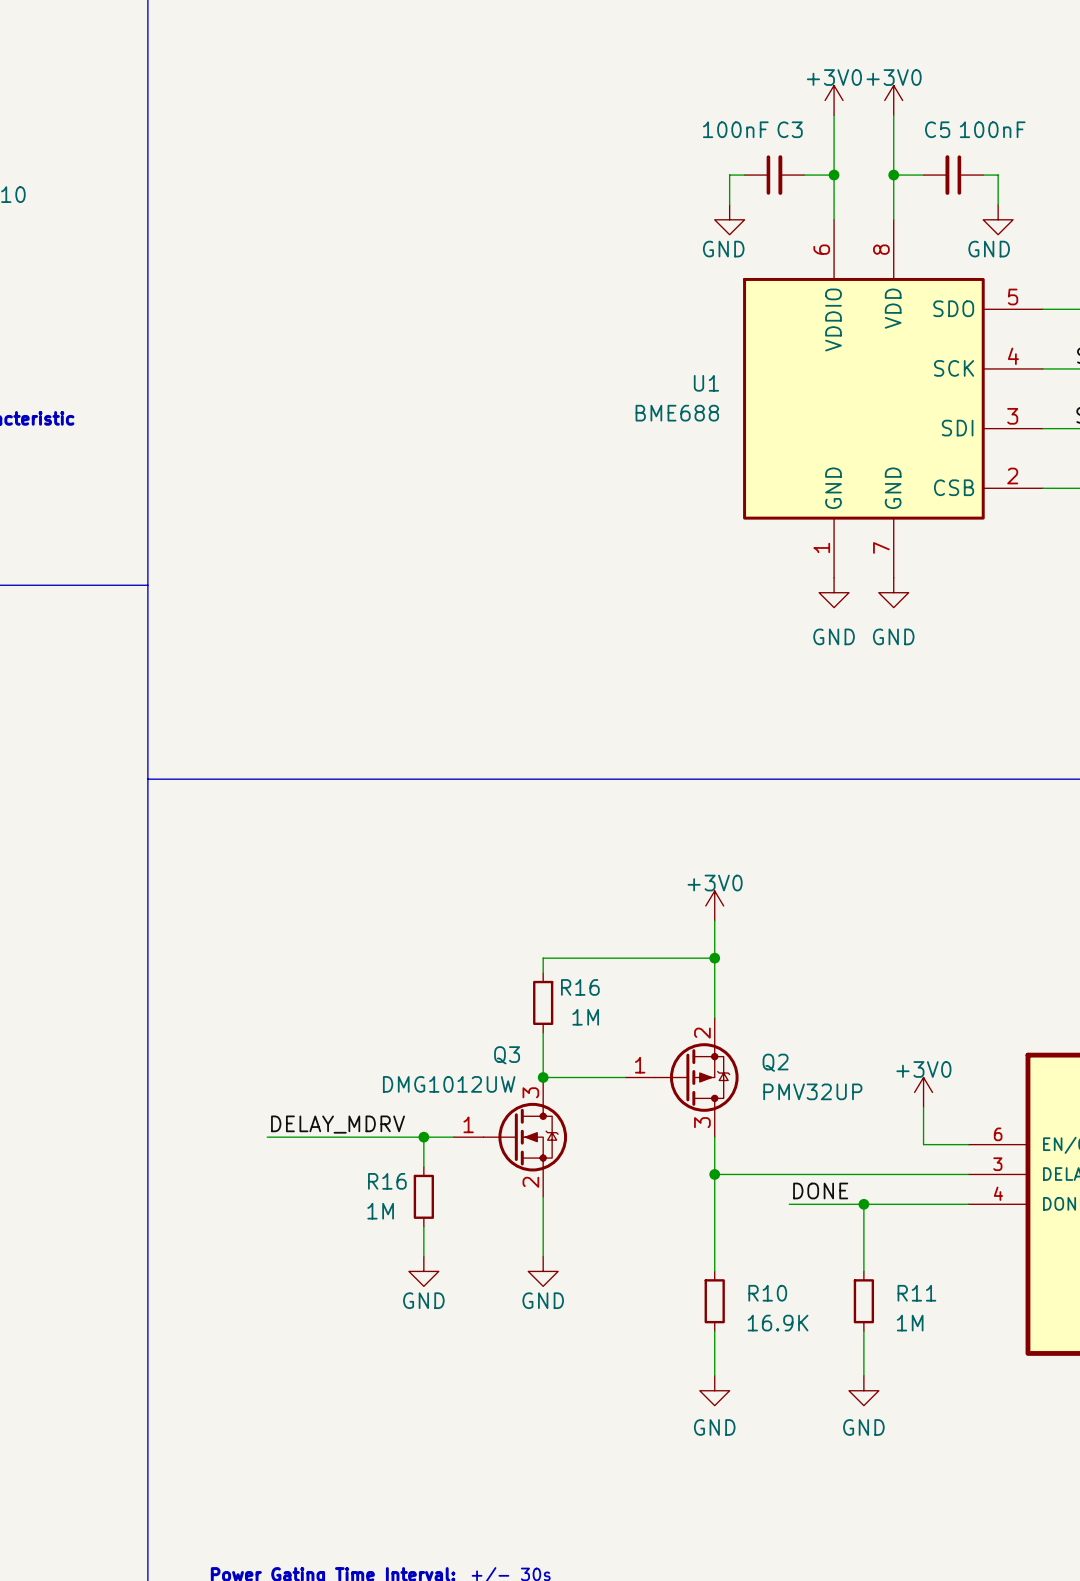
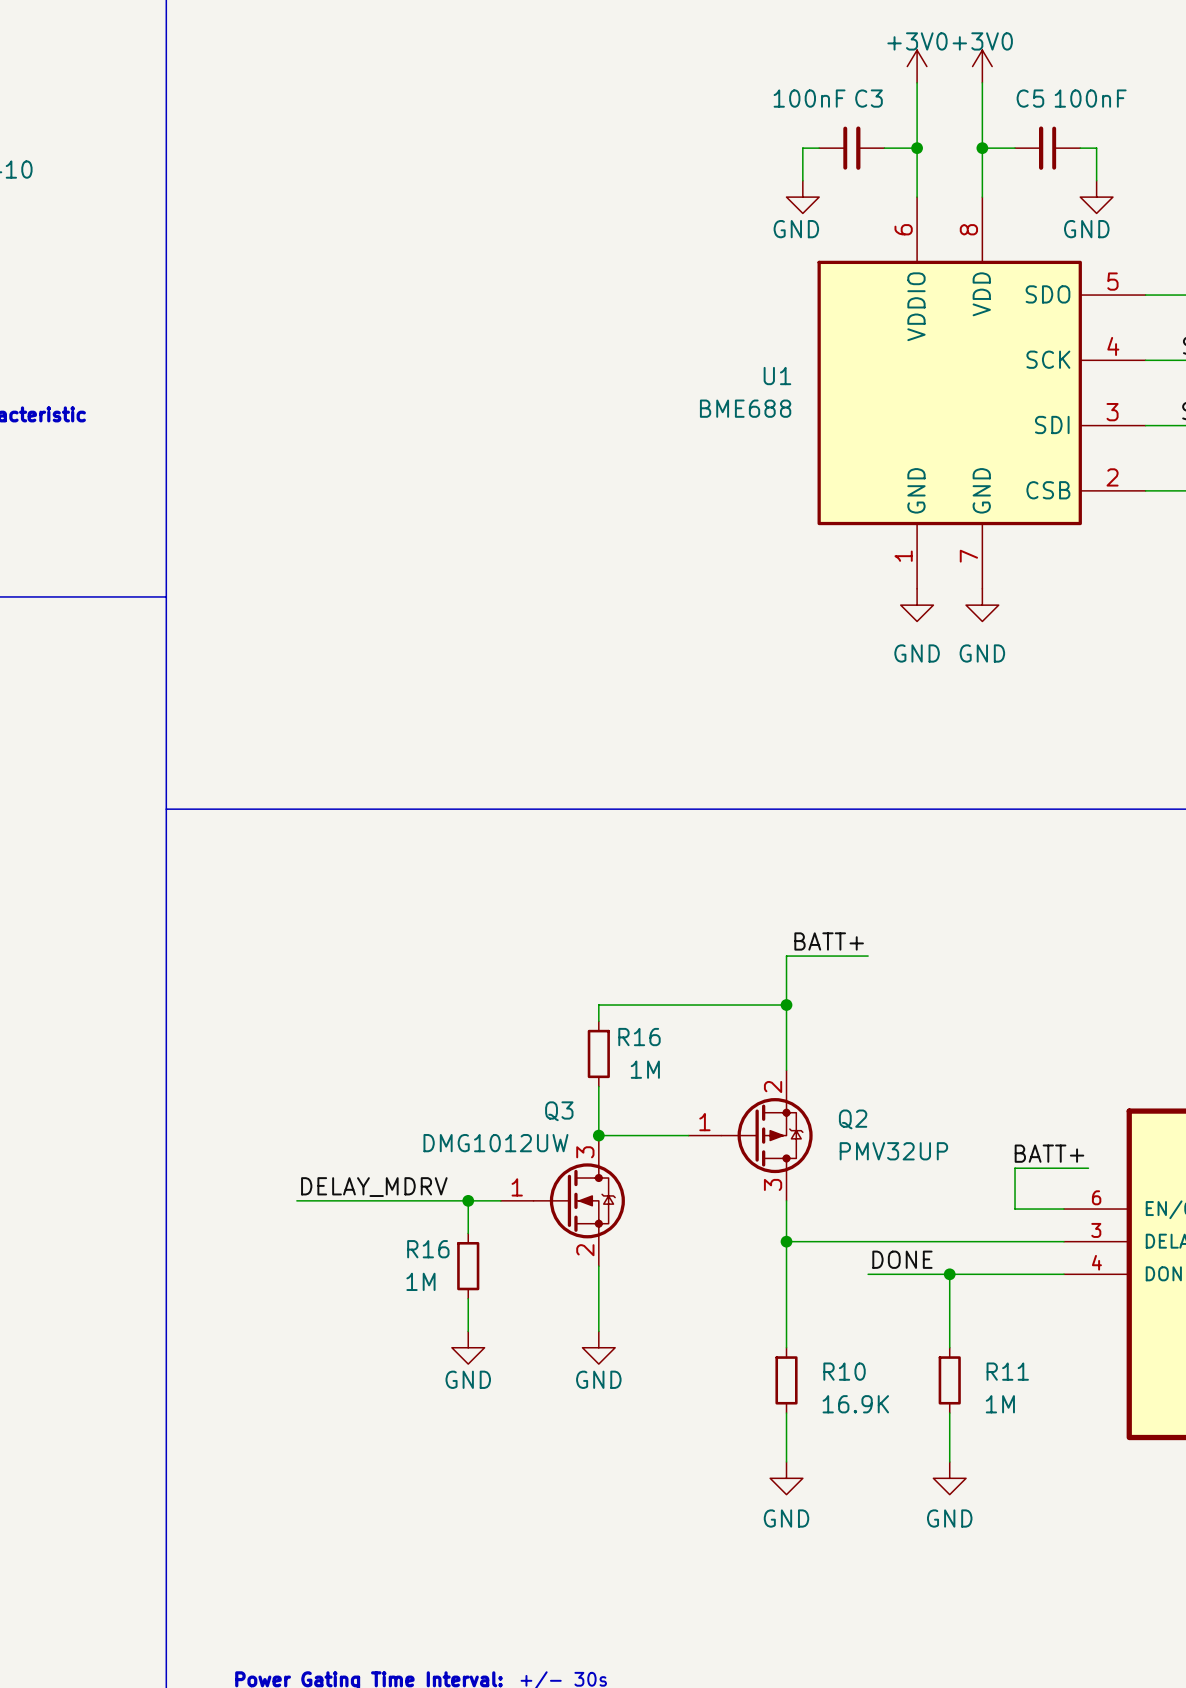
label: none -> BATT+ (829, 941)
power symbol: +3V0 (714, 905) -> none
wire: none -> (868, 956) (786, 956) (786, 964)
power symbol: +3V0 (923, 1092) -> none
label: none -> BATT+ (1049, 1153)
wire: none -> (1015, 1168) (1088, 1168)

